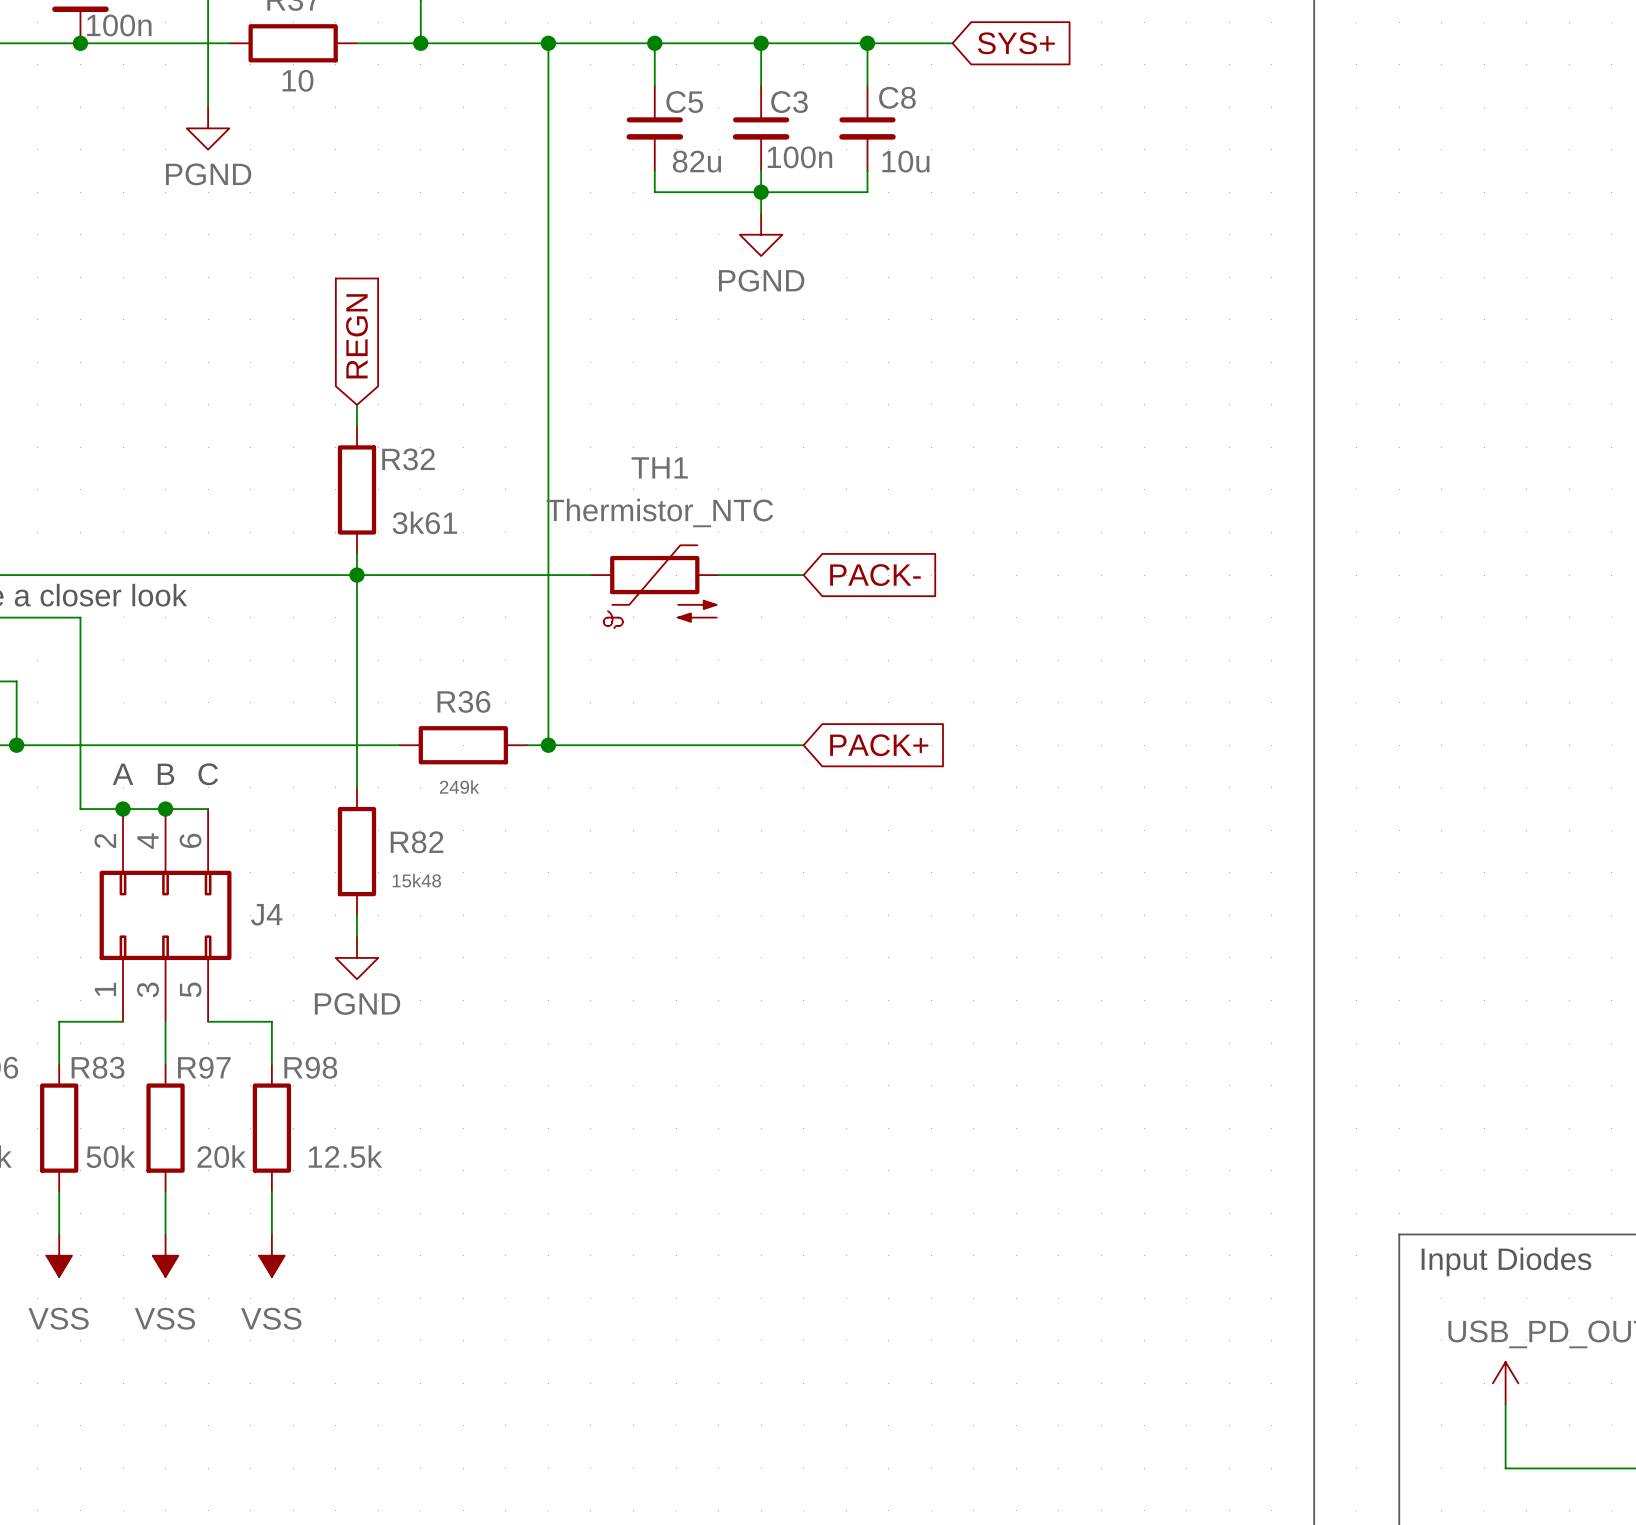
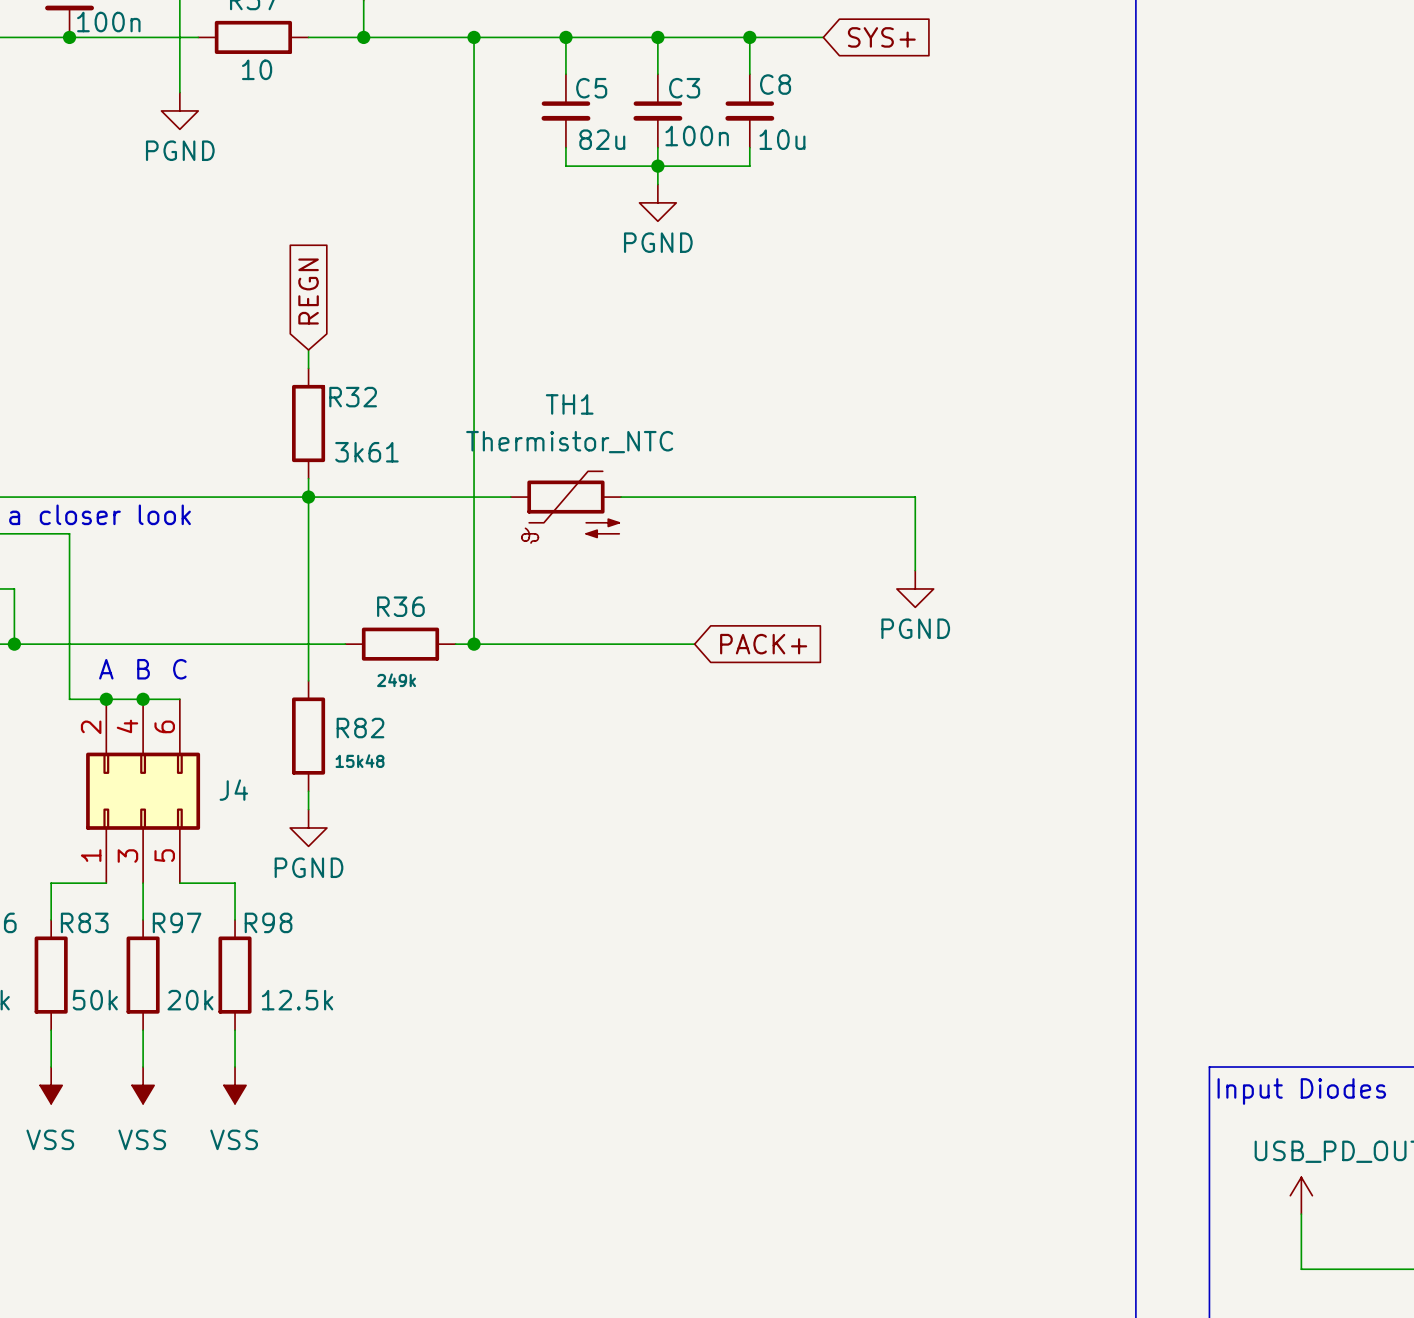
wire: none -> (694, 497) (915, 497) (915, 570)
global label: PACK- (875, 575) -> none
power symbol: none -> PGND (915, 588)

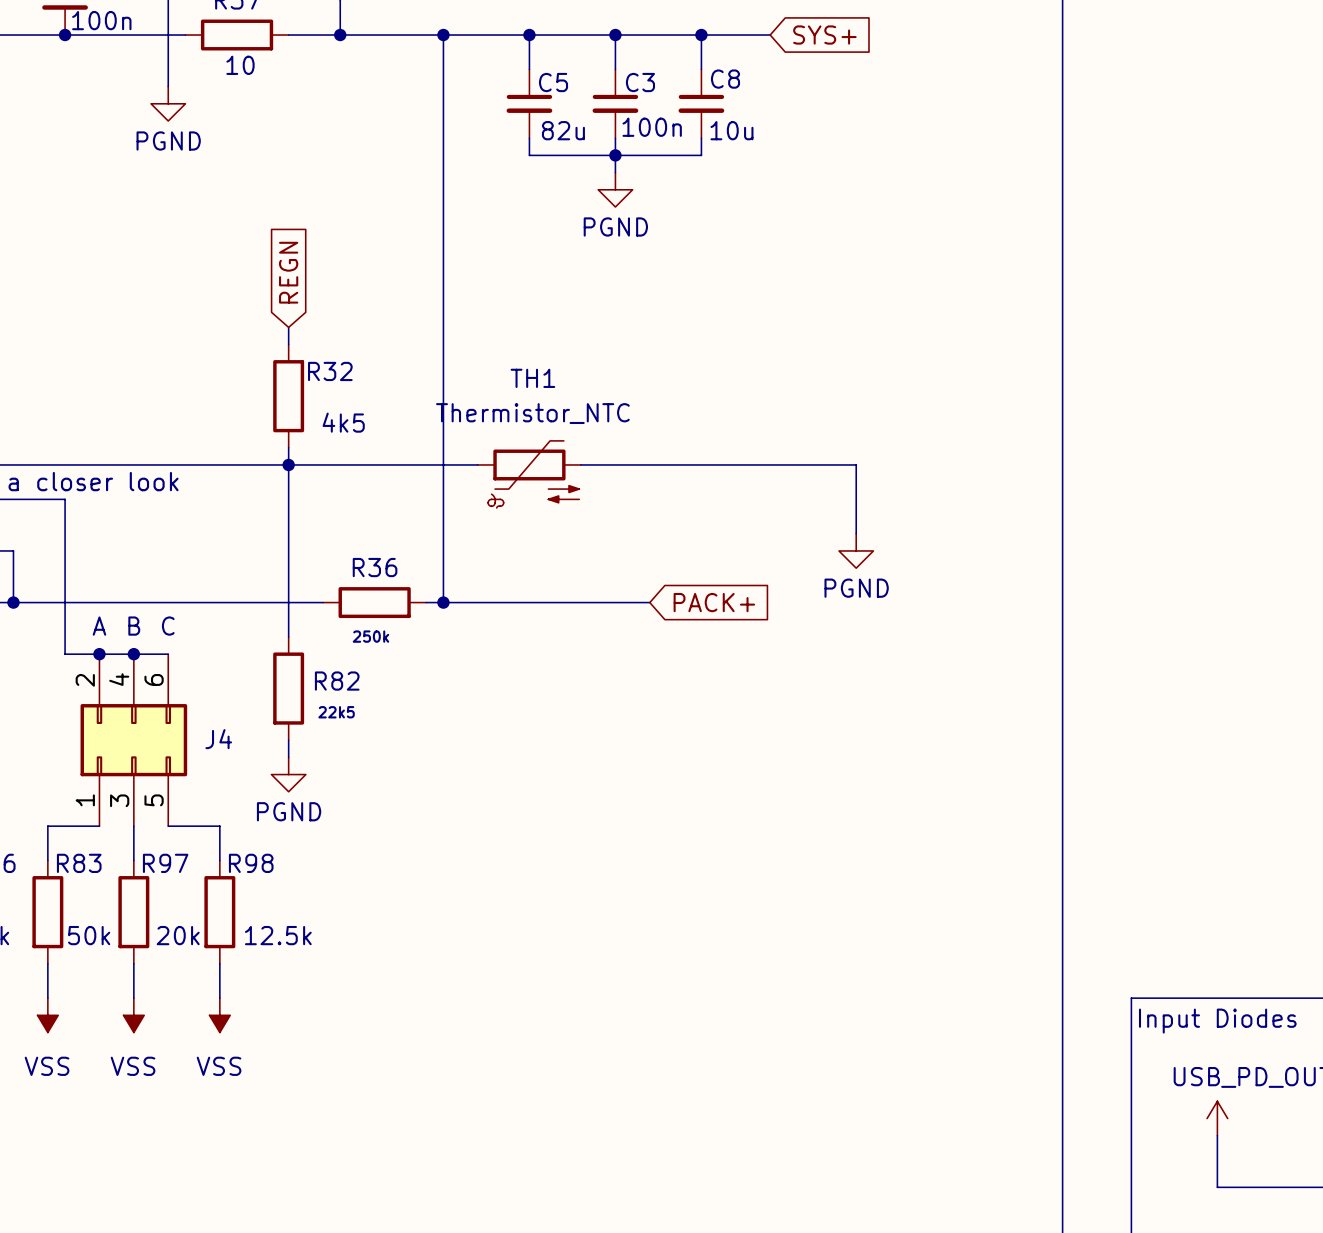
R32 value: 3k61 (366, 452) -> 4k5 (343, 422)
R36 value: 249k (396, 680) -> 250k (370, 636)
R82 value: 15k48 (360, 761) -> 22k5 (336, 712)

